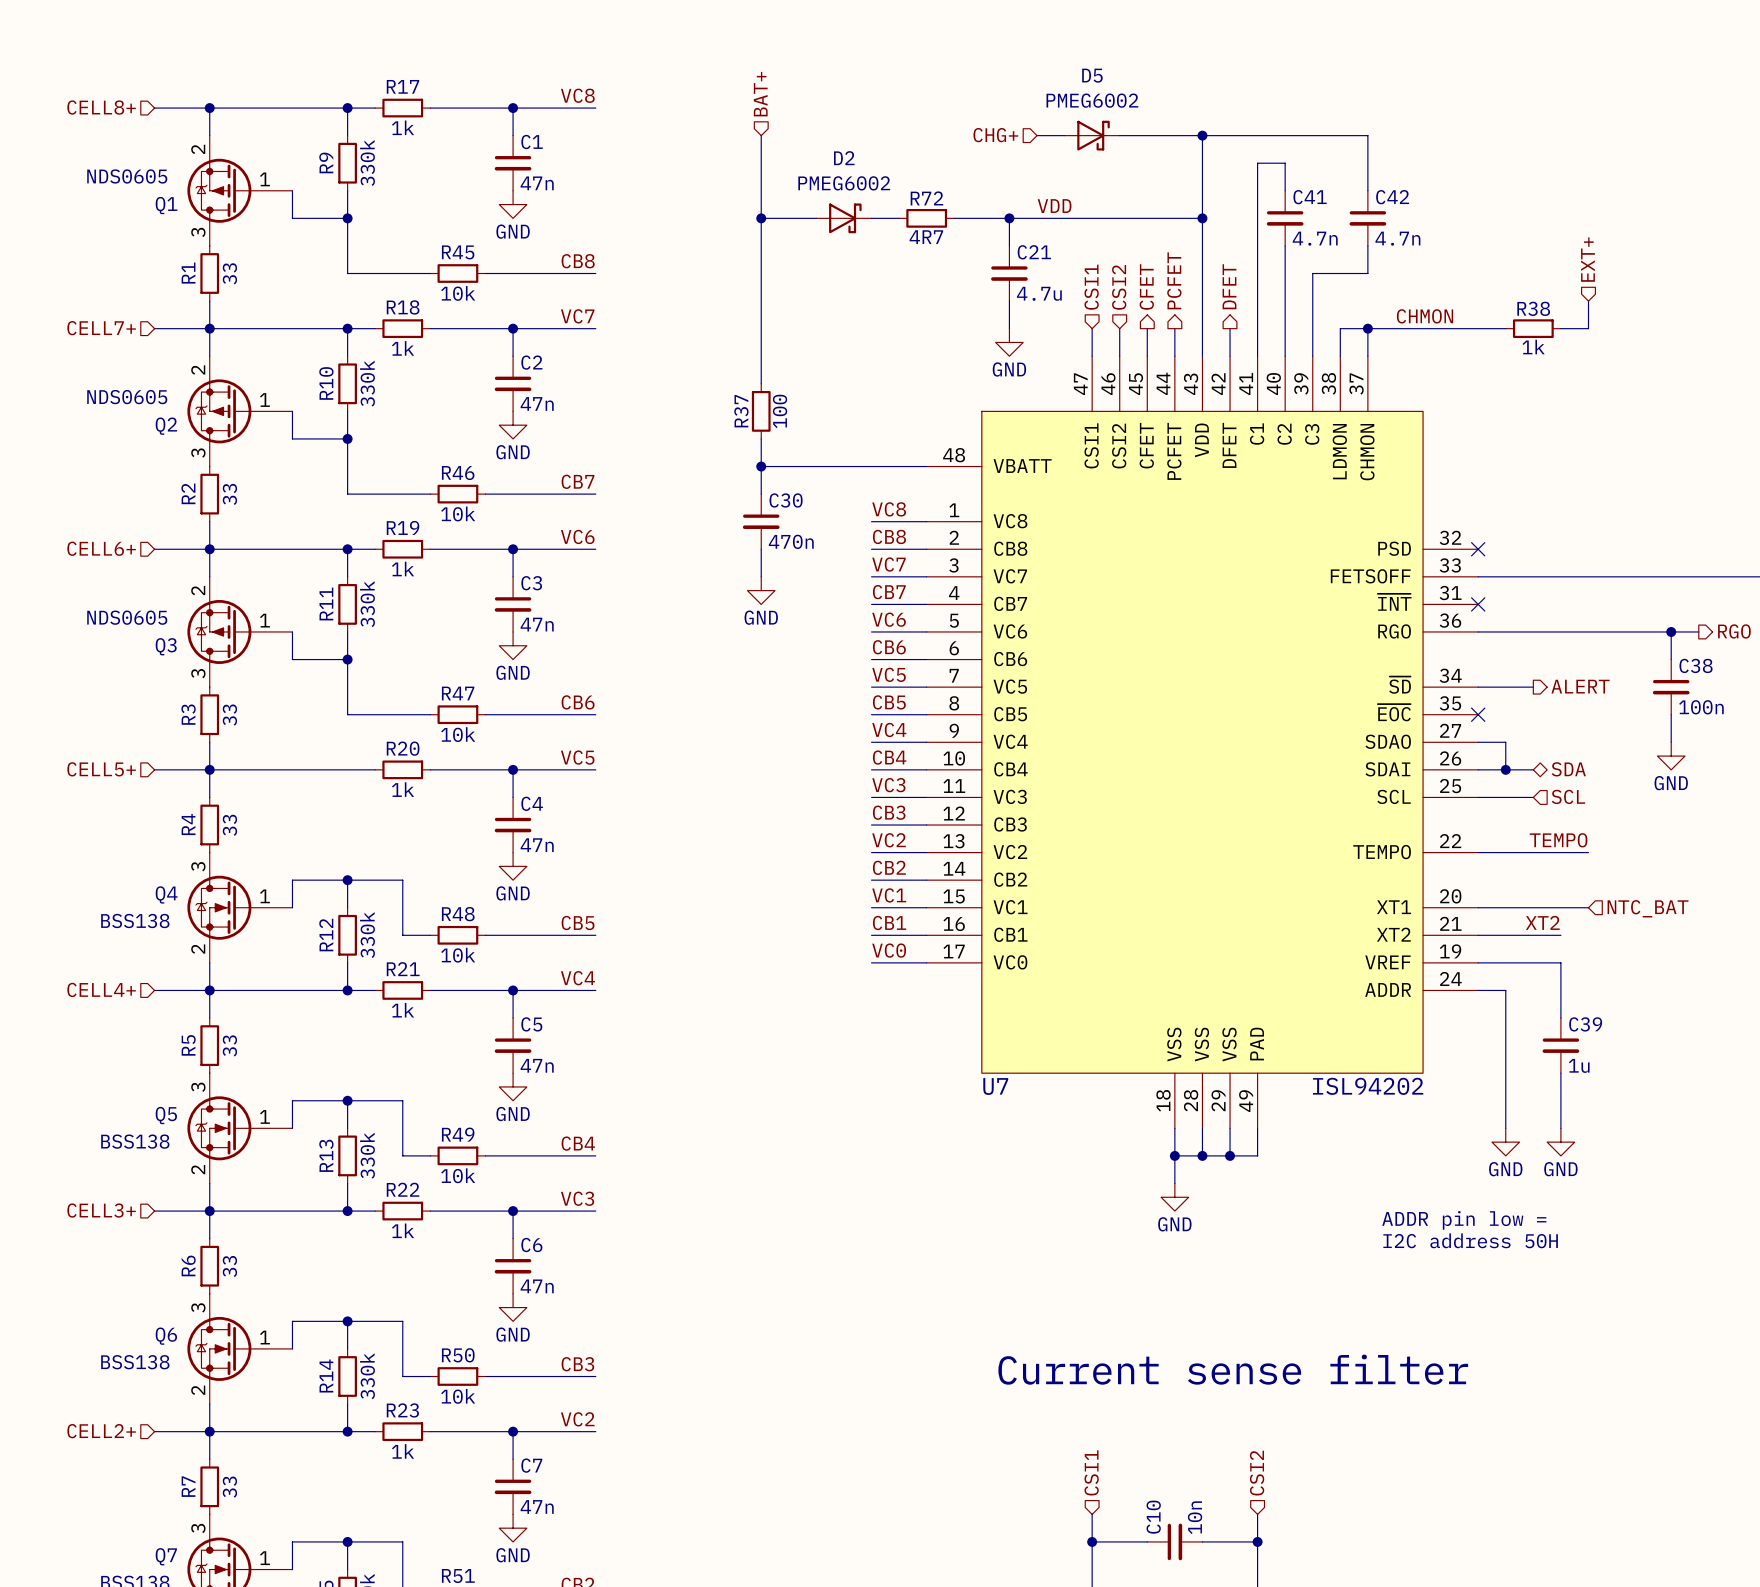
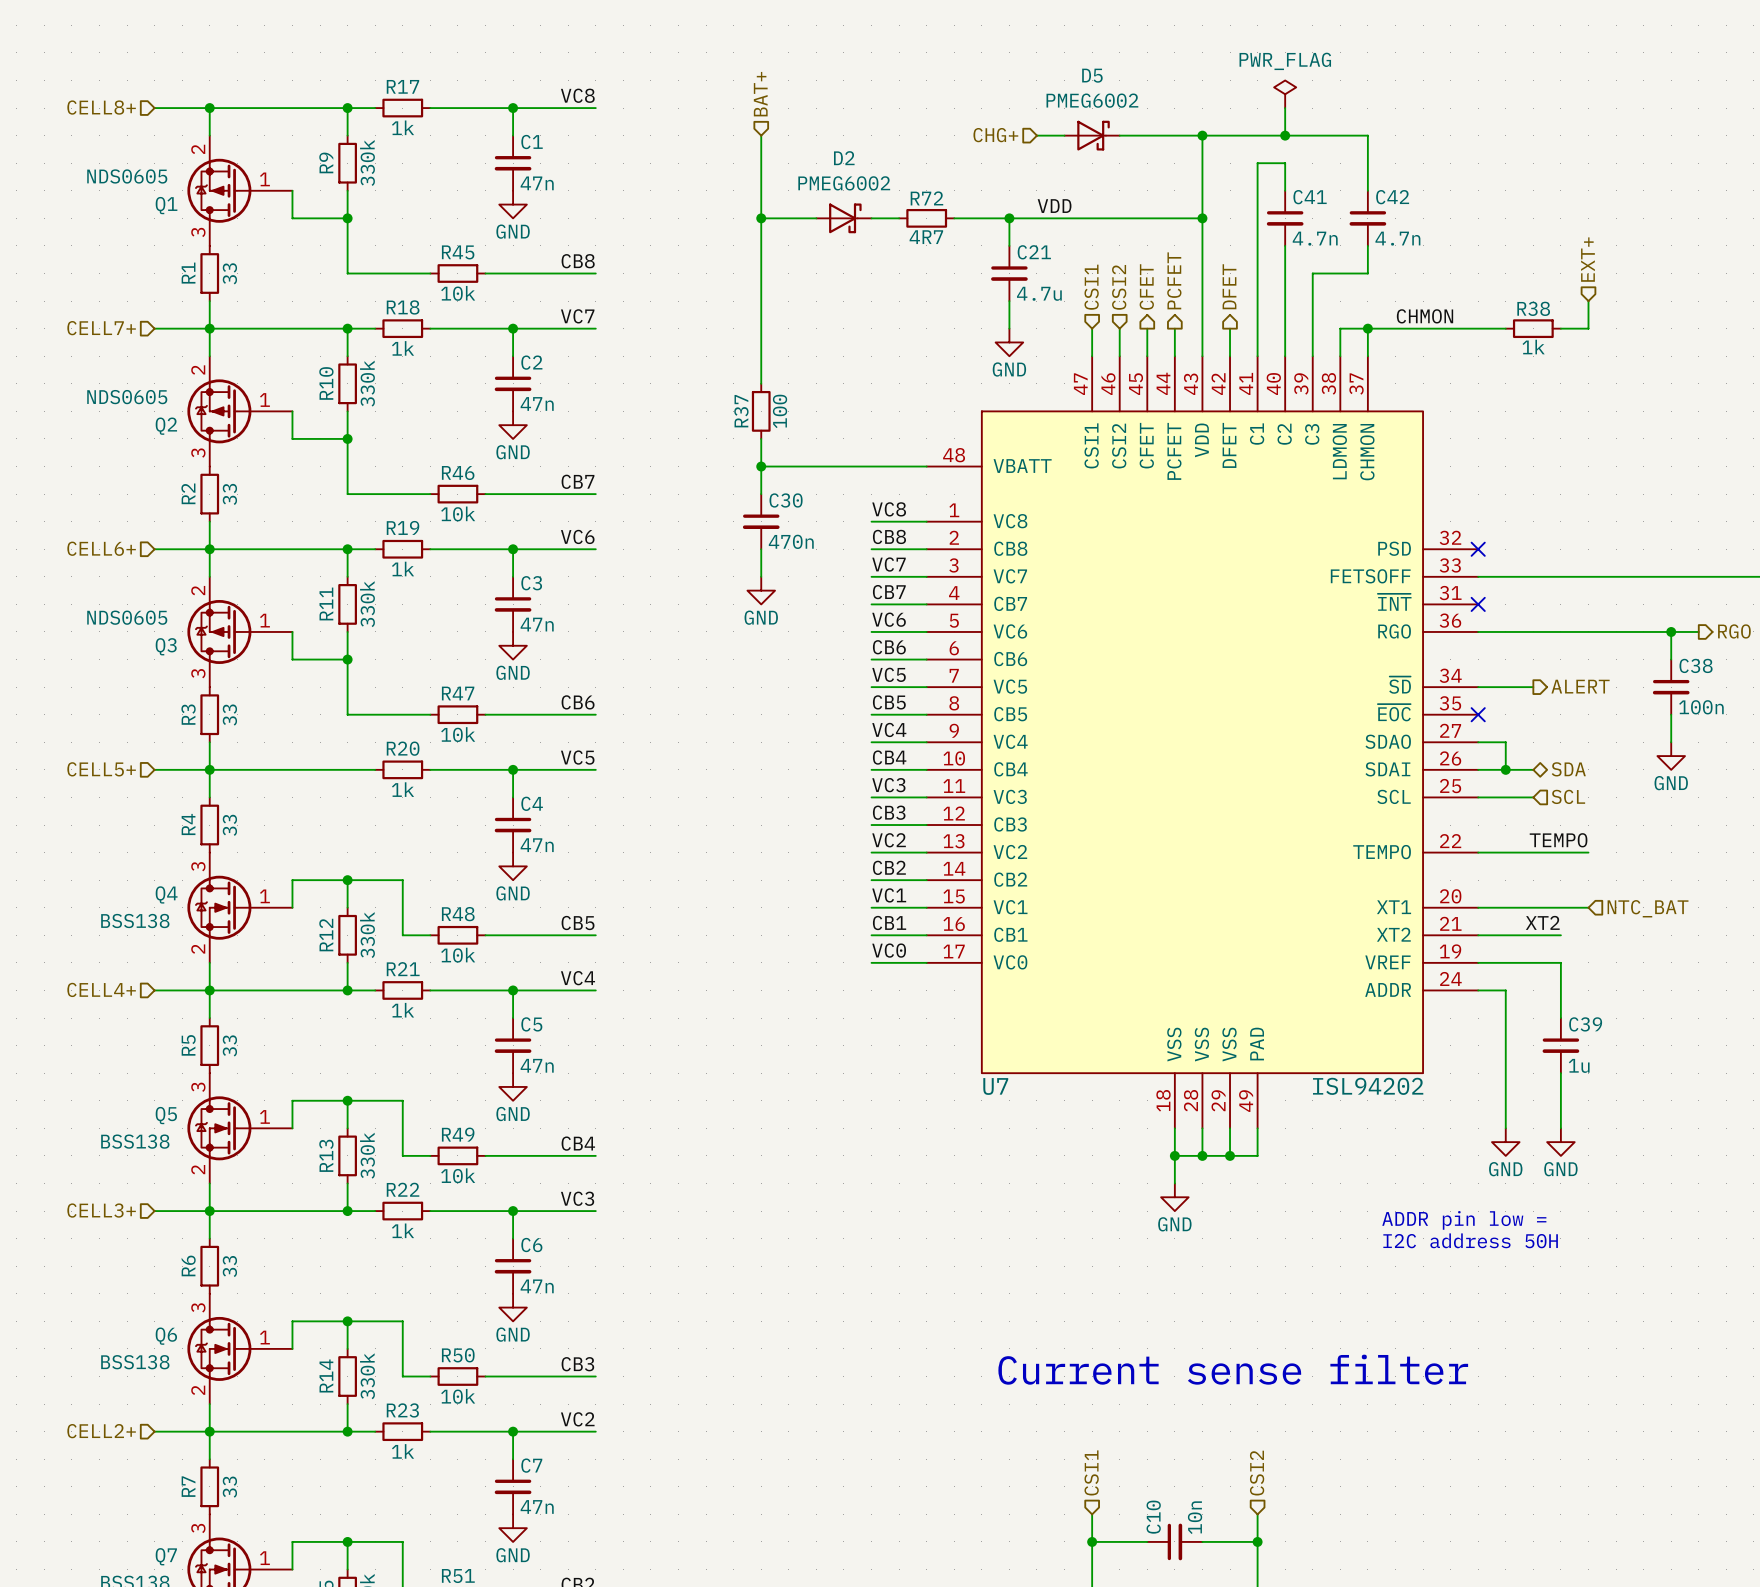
power symbol: none -> PWR_FLAG (1285, 94)
wire: none -> (1285, 108) (1285, 135)
junction: none -> (1285, 135)

